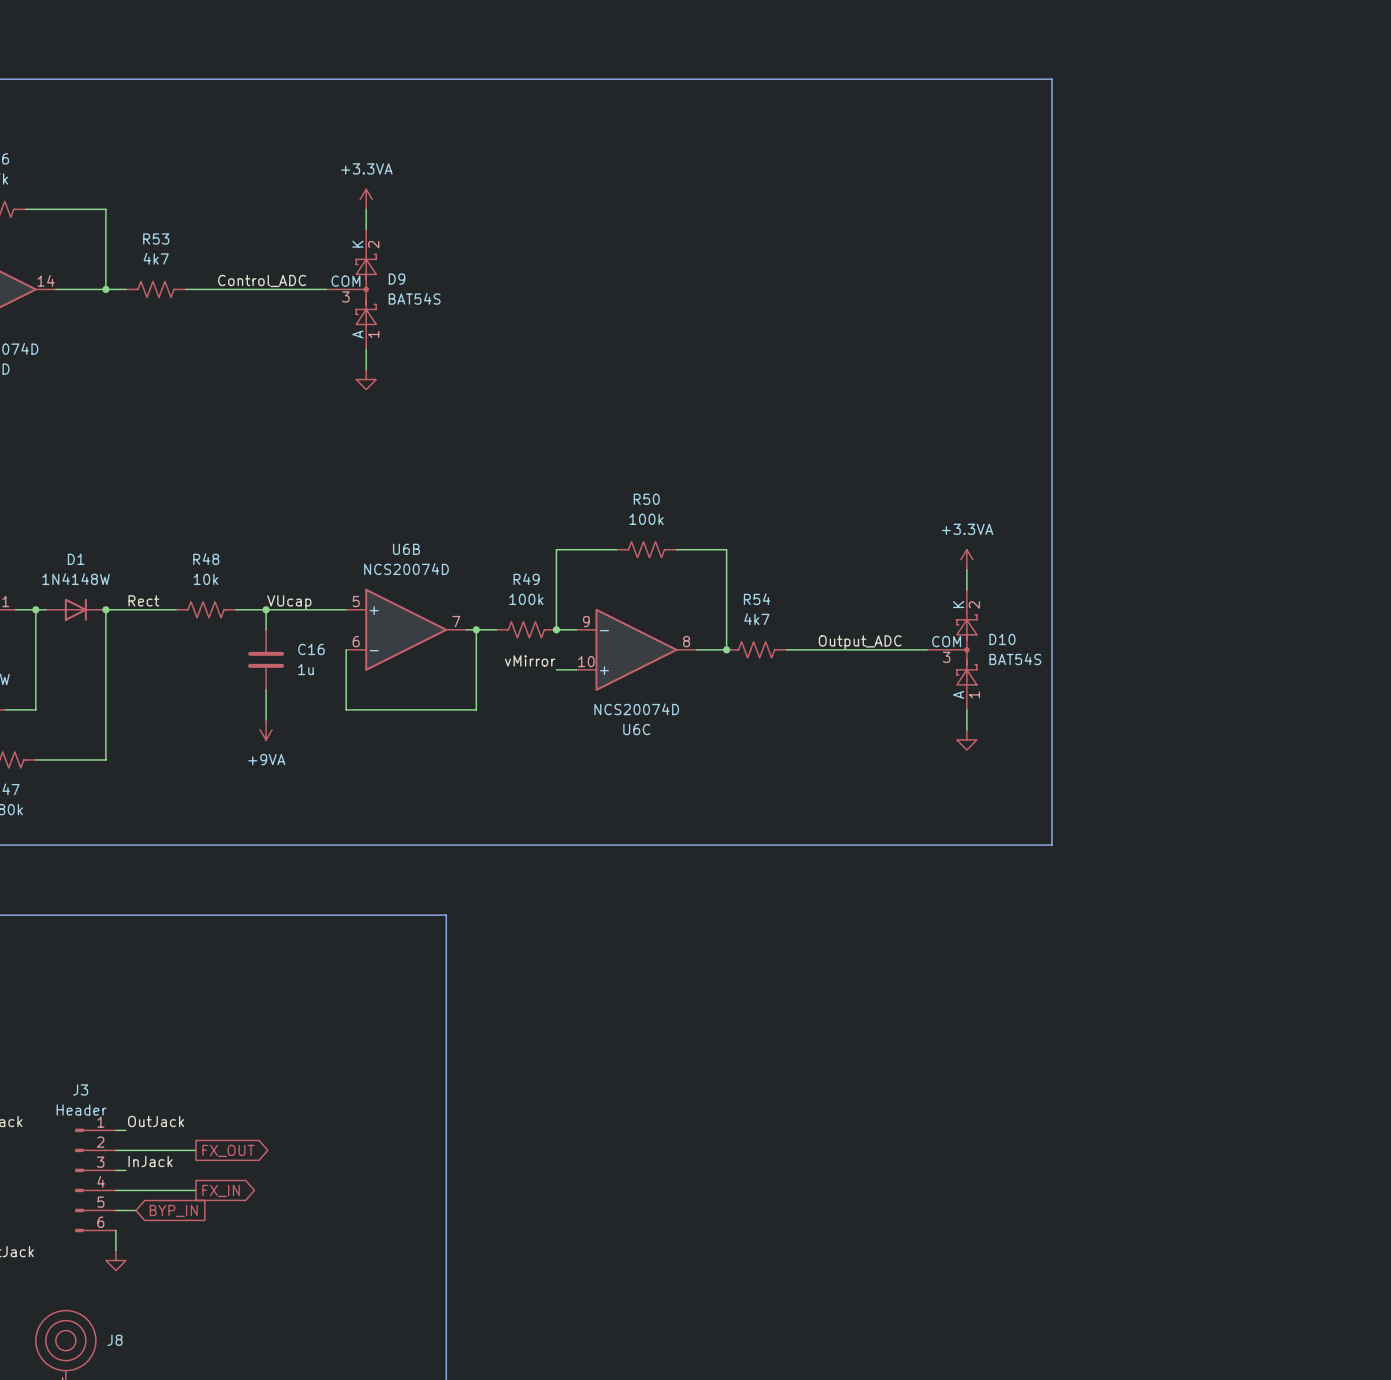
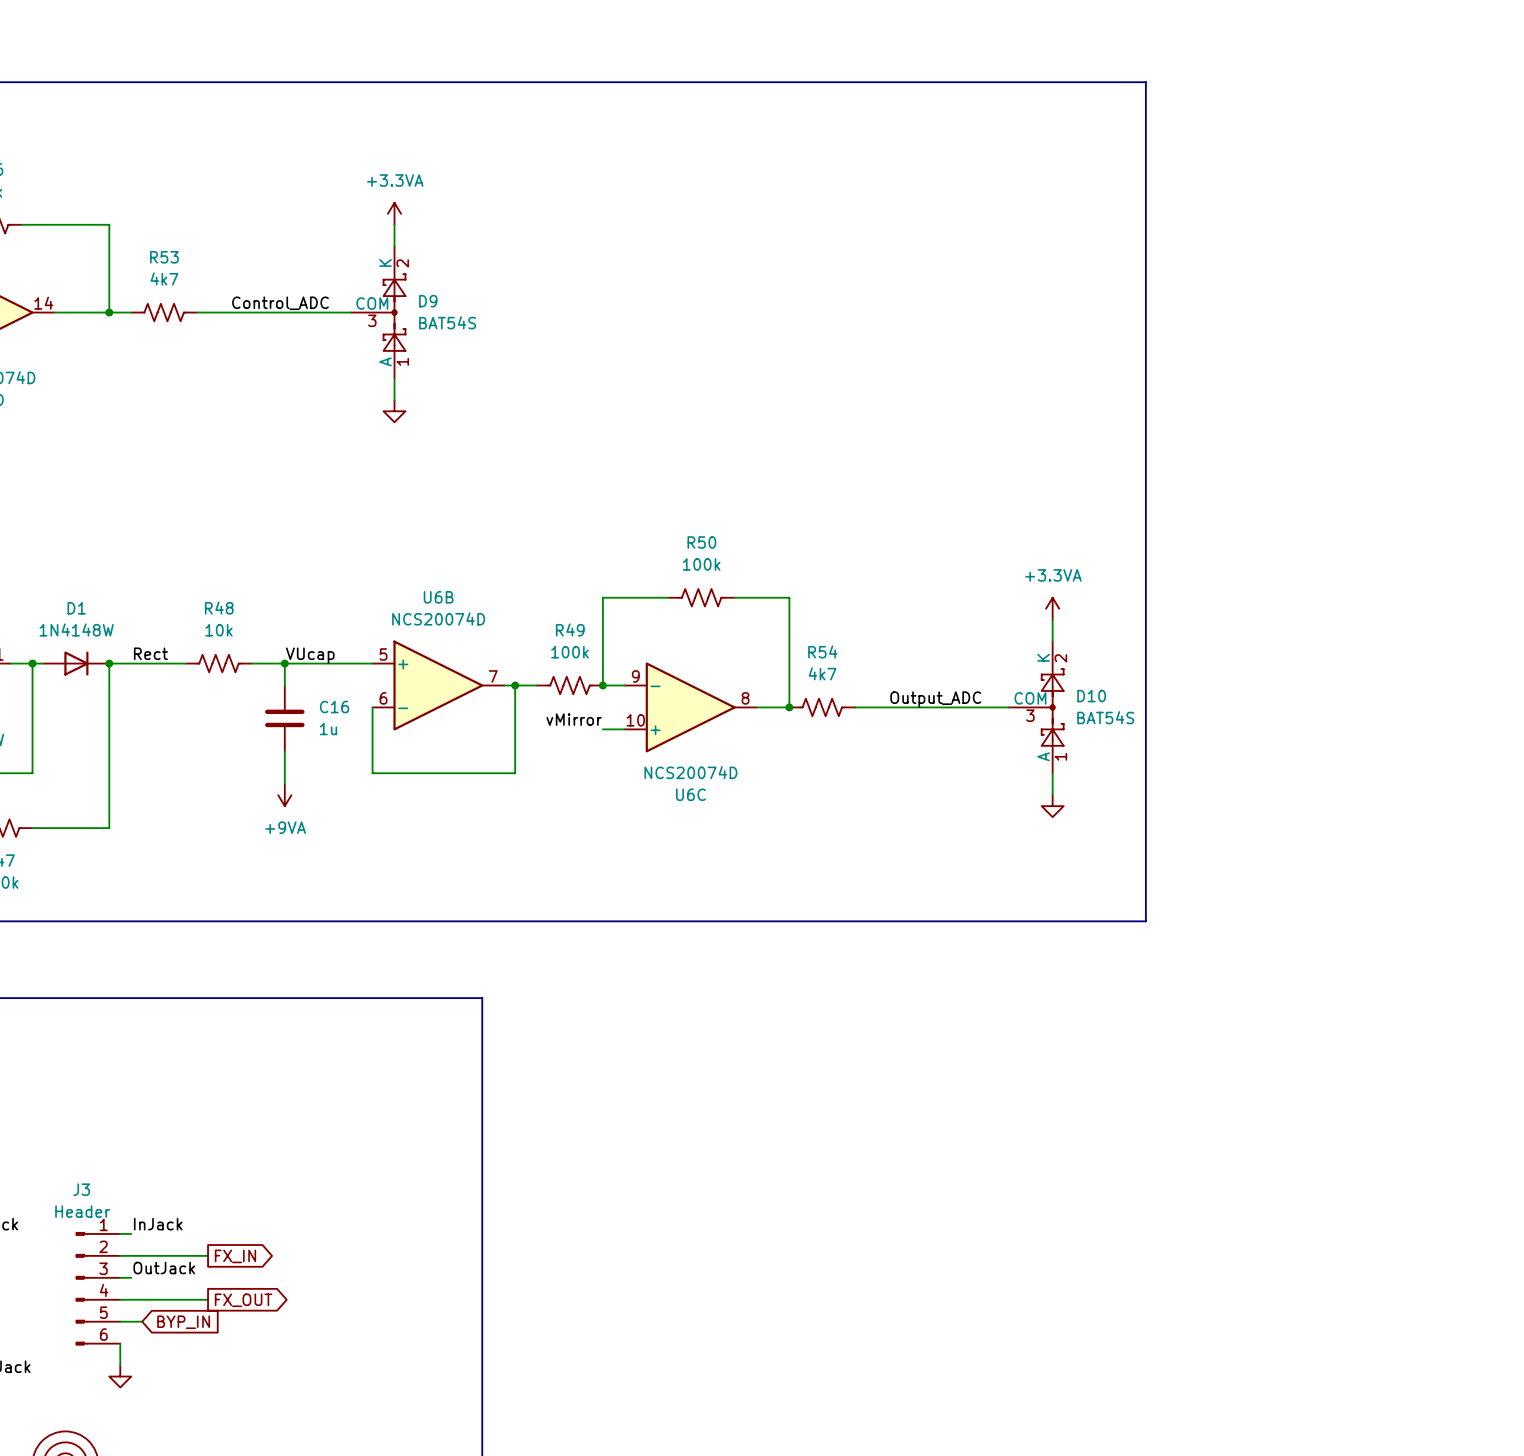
label: OutJack (156, 1121) -> InJack (158, 1224)
global label: FX_OUT (228, 1150) -> FX_IN (235, 1256)
label: InJack (150, 1161) -> OutJack (164, 1268)
global label: FX_IN (221, 1190) -> FX_OUT (243, 1300)

